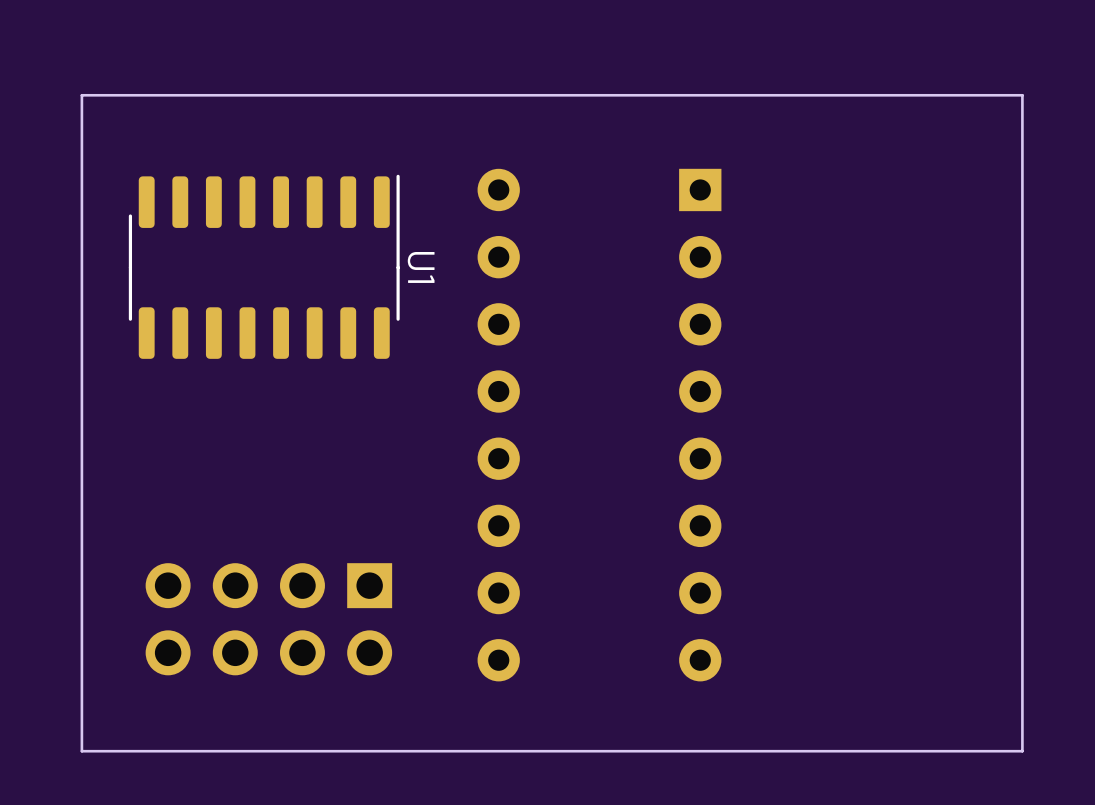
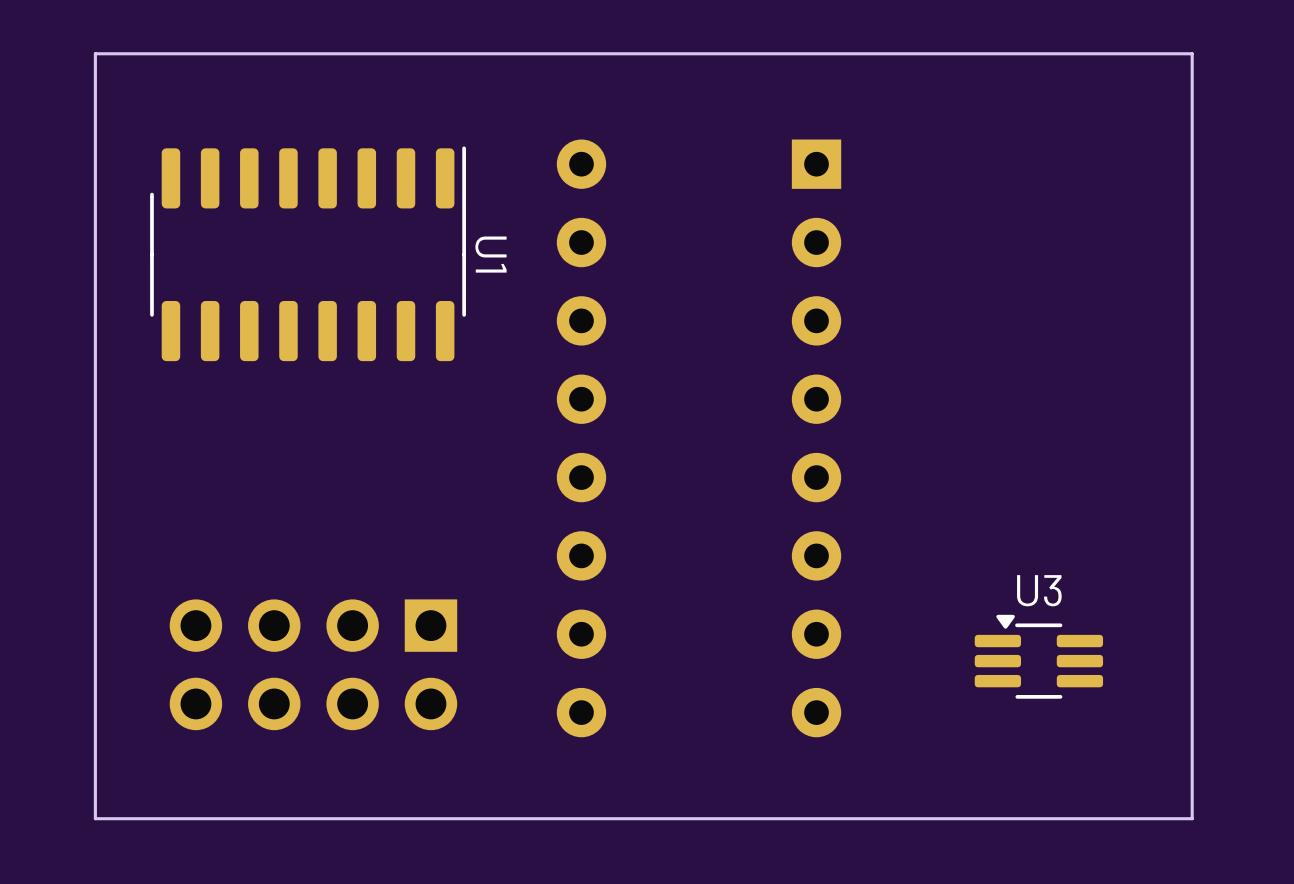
U3: none -> (1038, 656)

